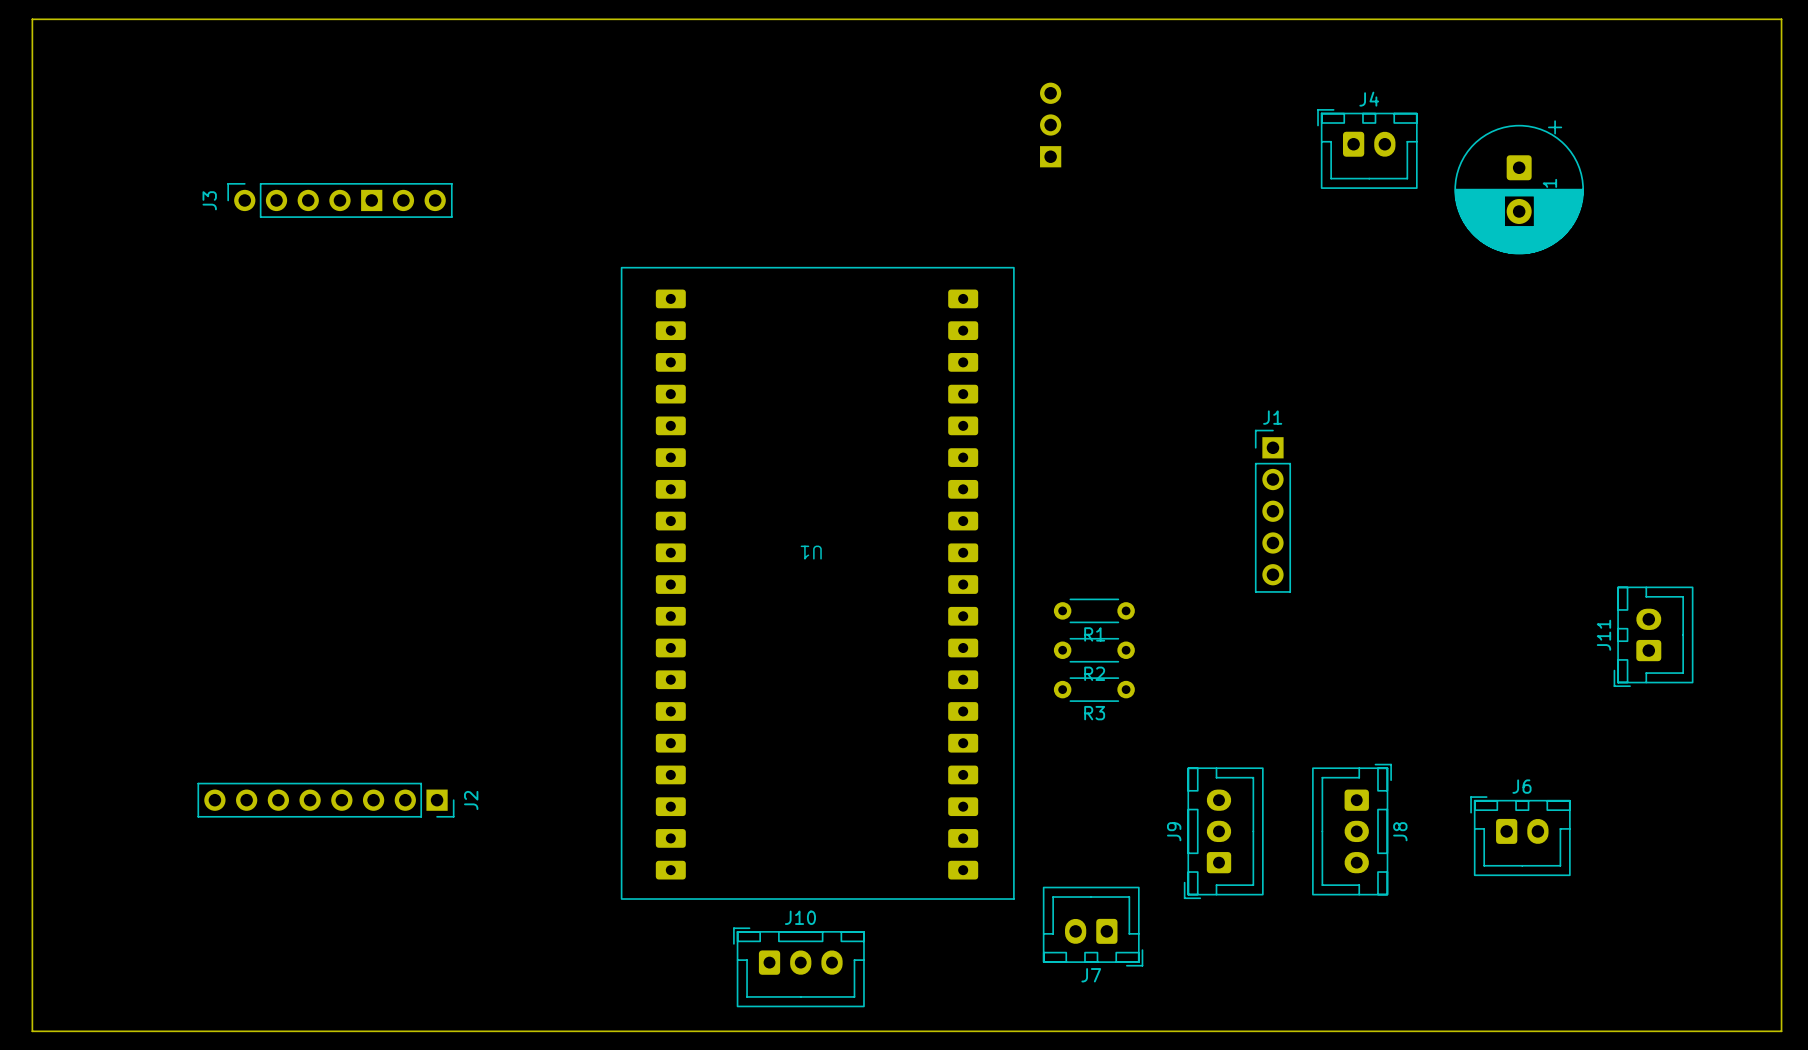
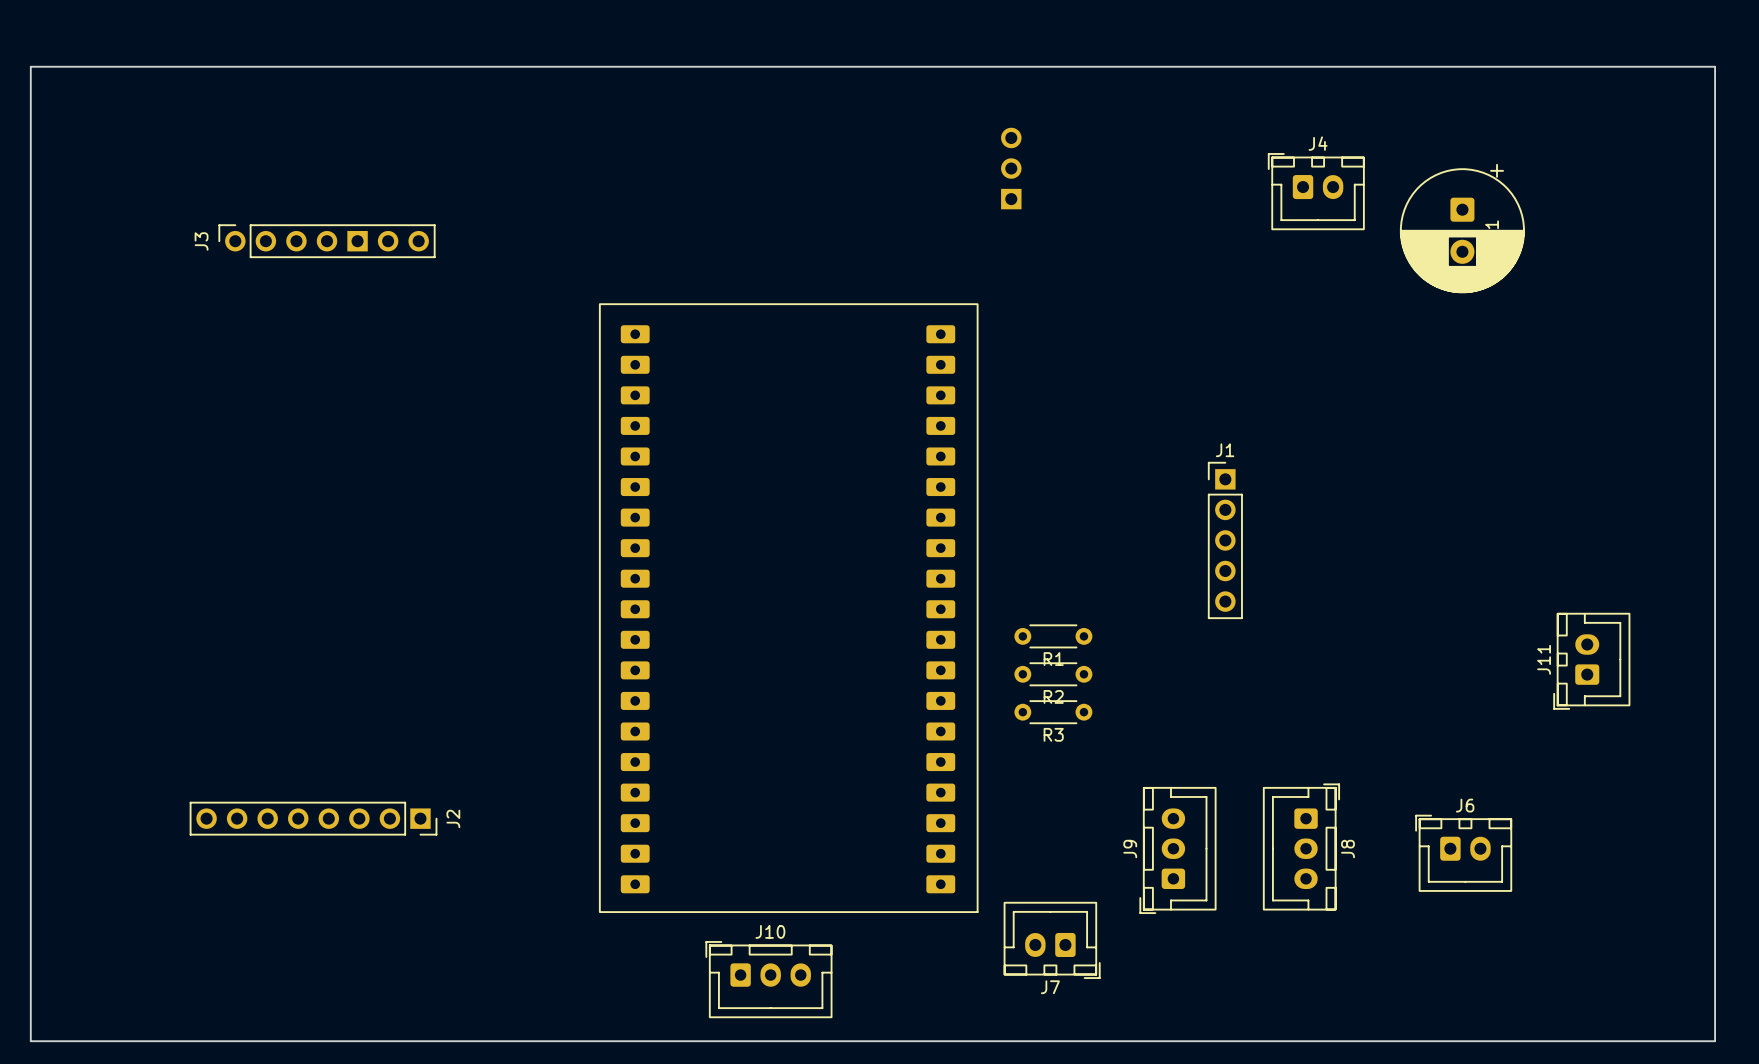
part: none -> (788, 608)
U1: (817, 583) -> none

